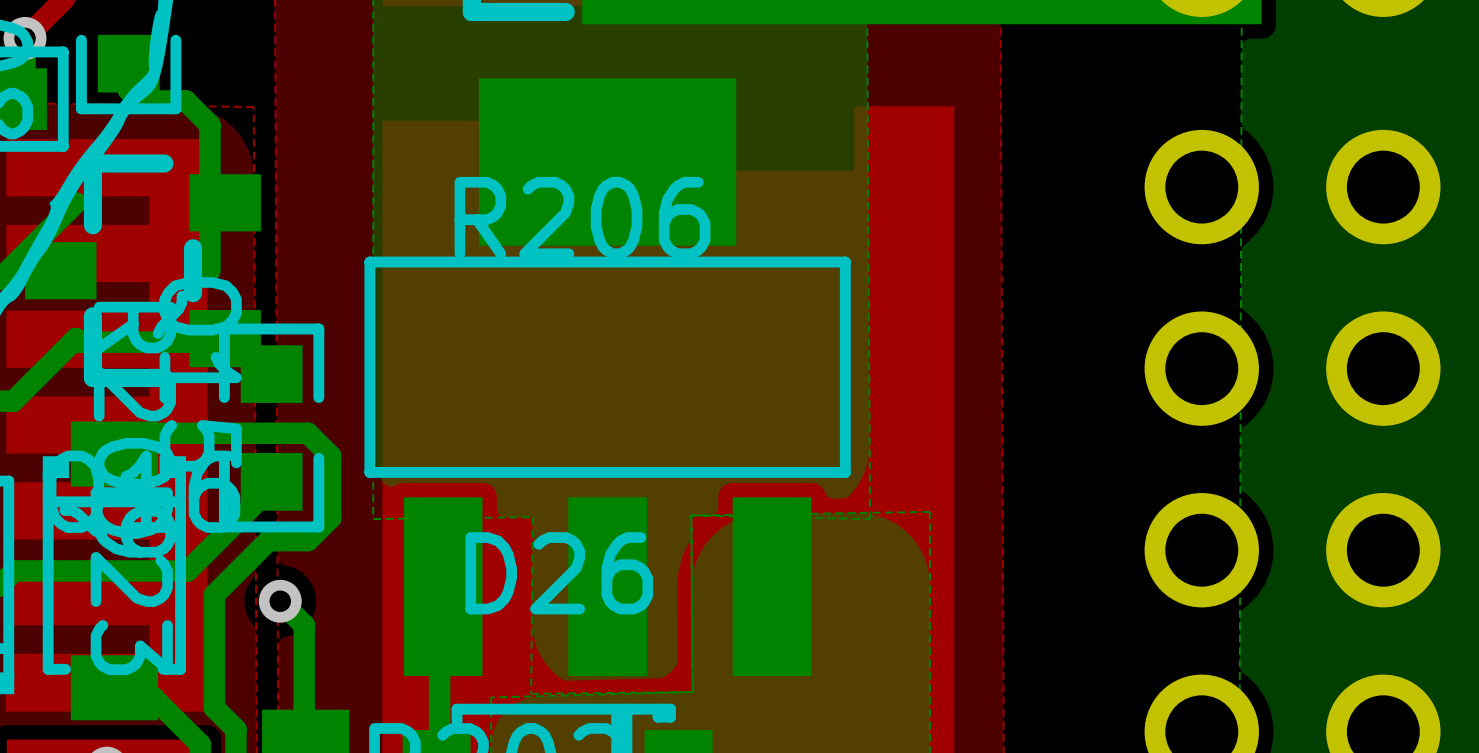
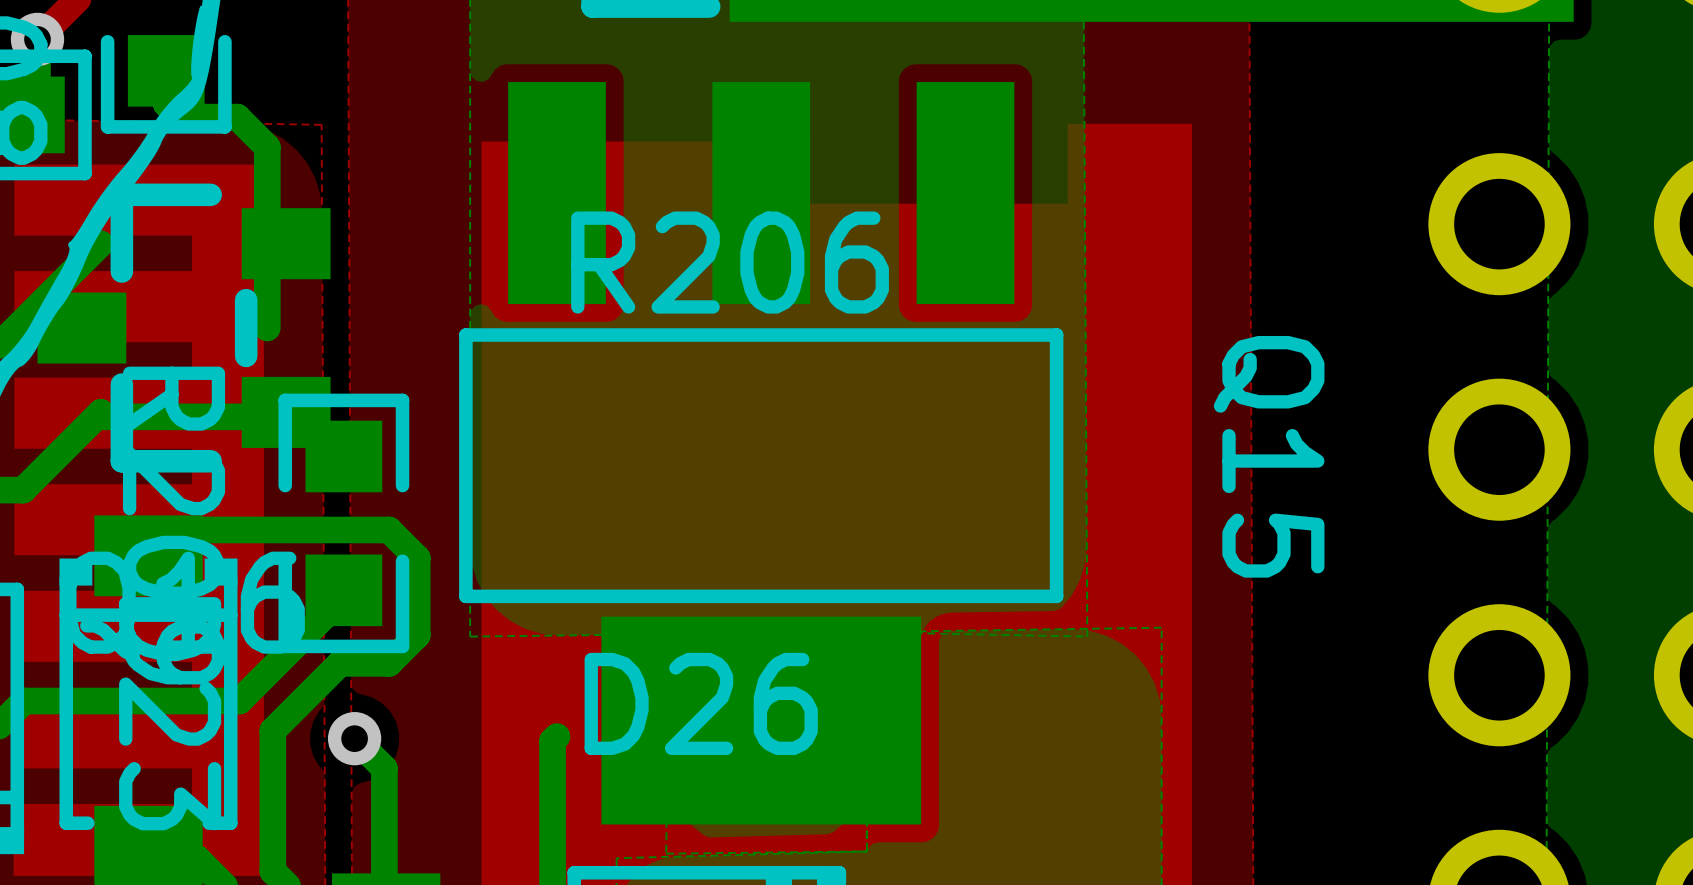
Q15 rotation: 0° (607, 377) -> 180° (761, 453)

